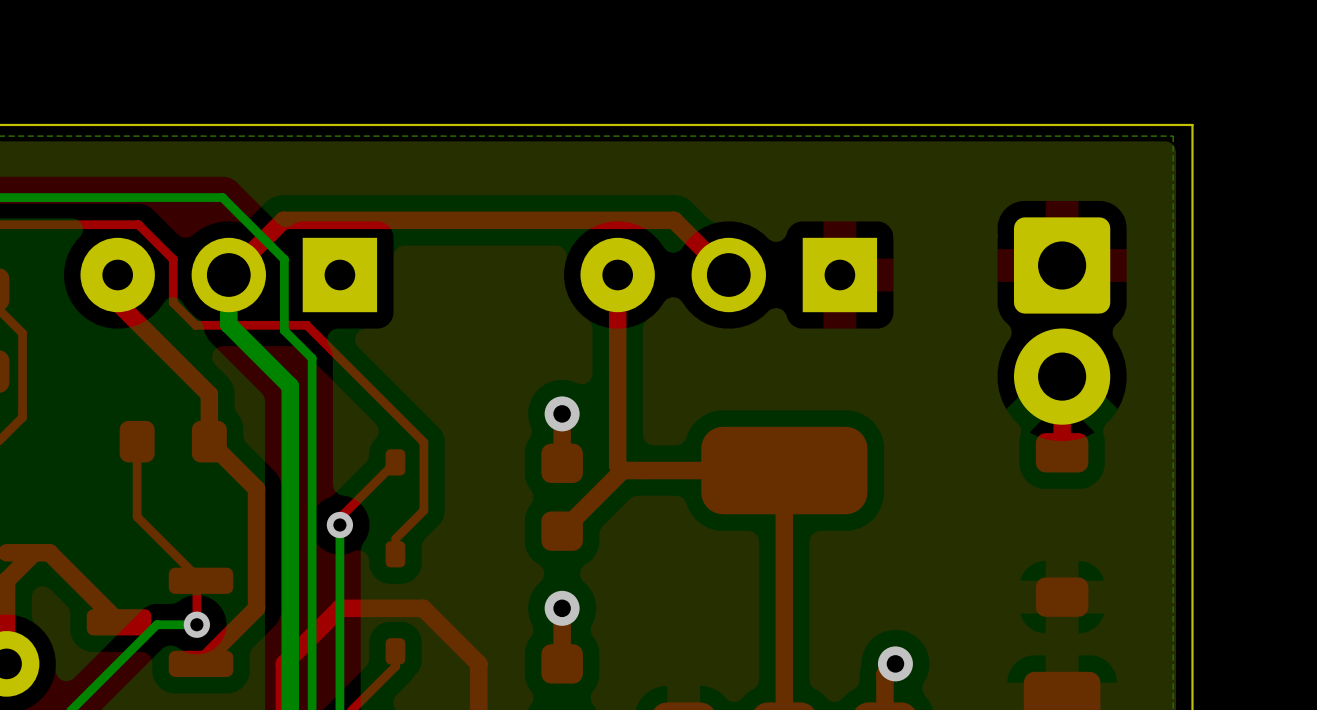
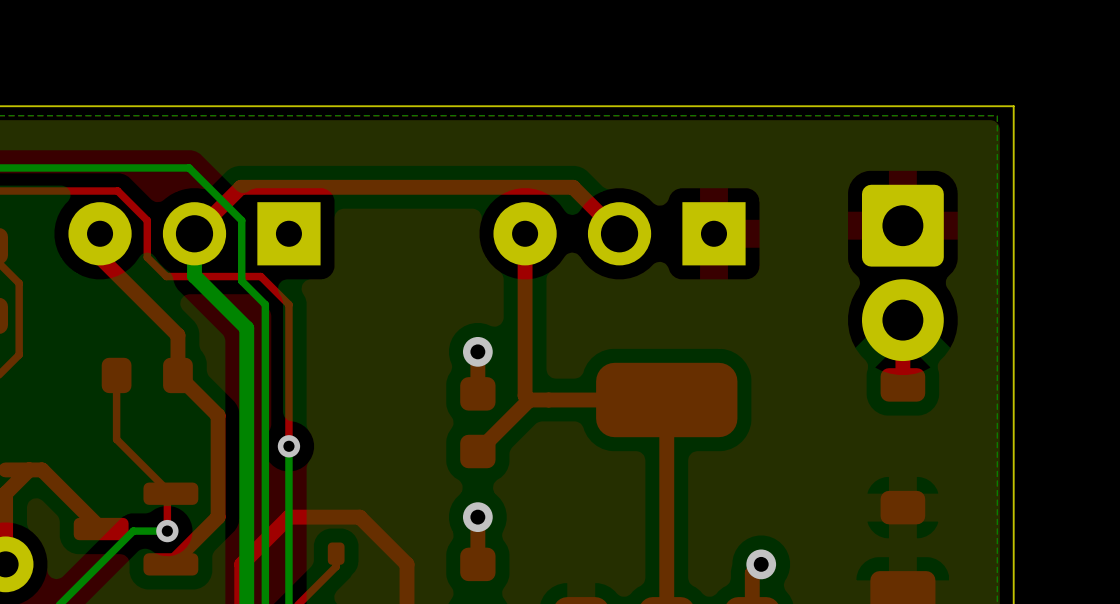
top track: (339, 358) (423, 442) (423, 510) (395, 538) -> (288, 304) (288, 440)
top track: (395, 462) (339, 517) -> none
part: (395, 508) -> none

